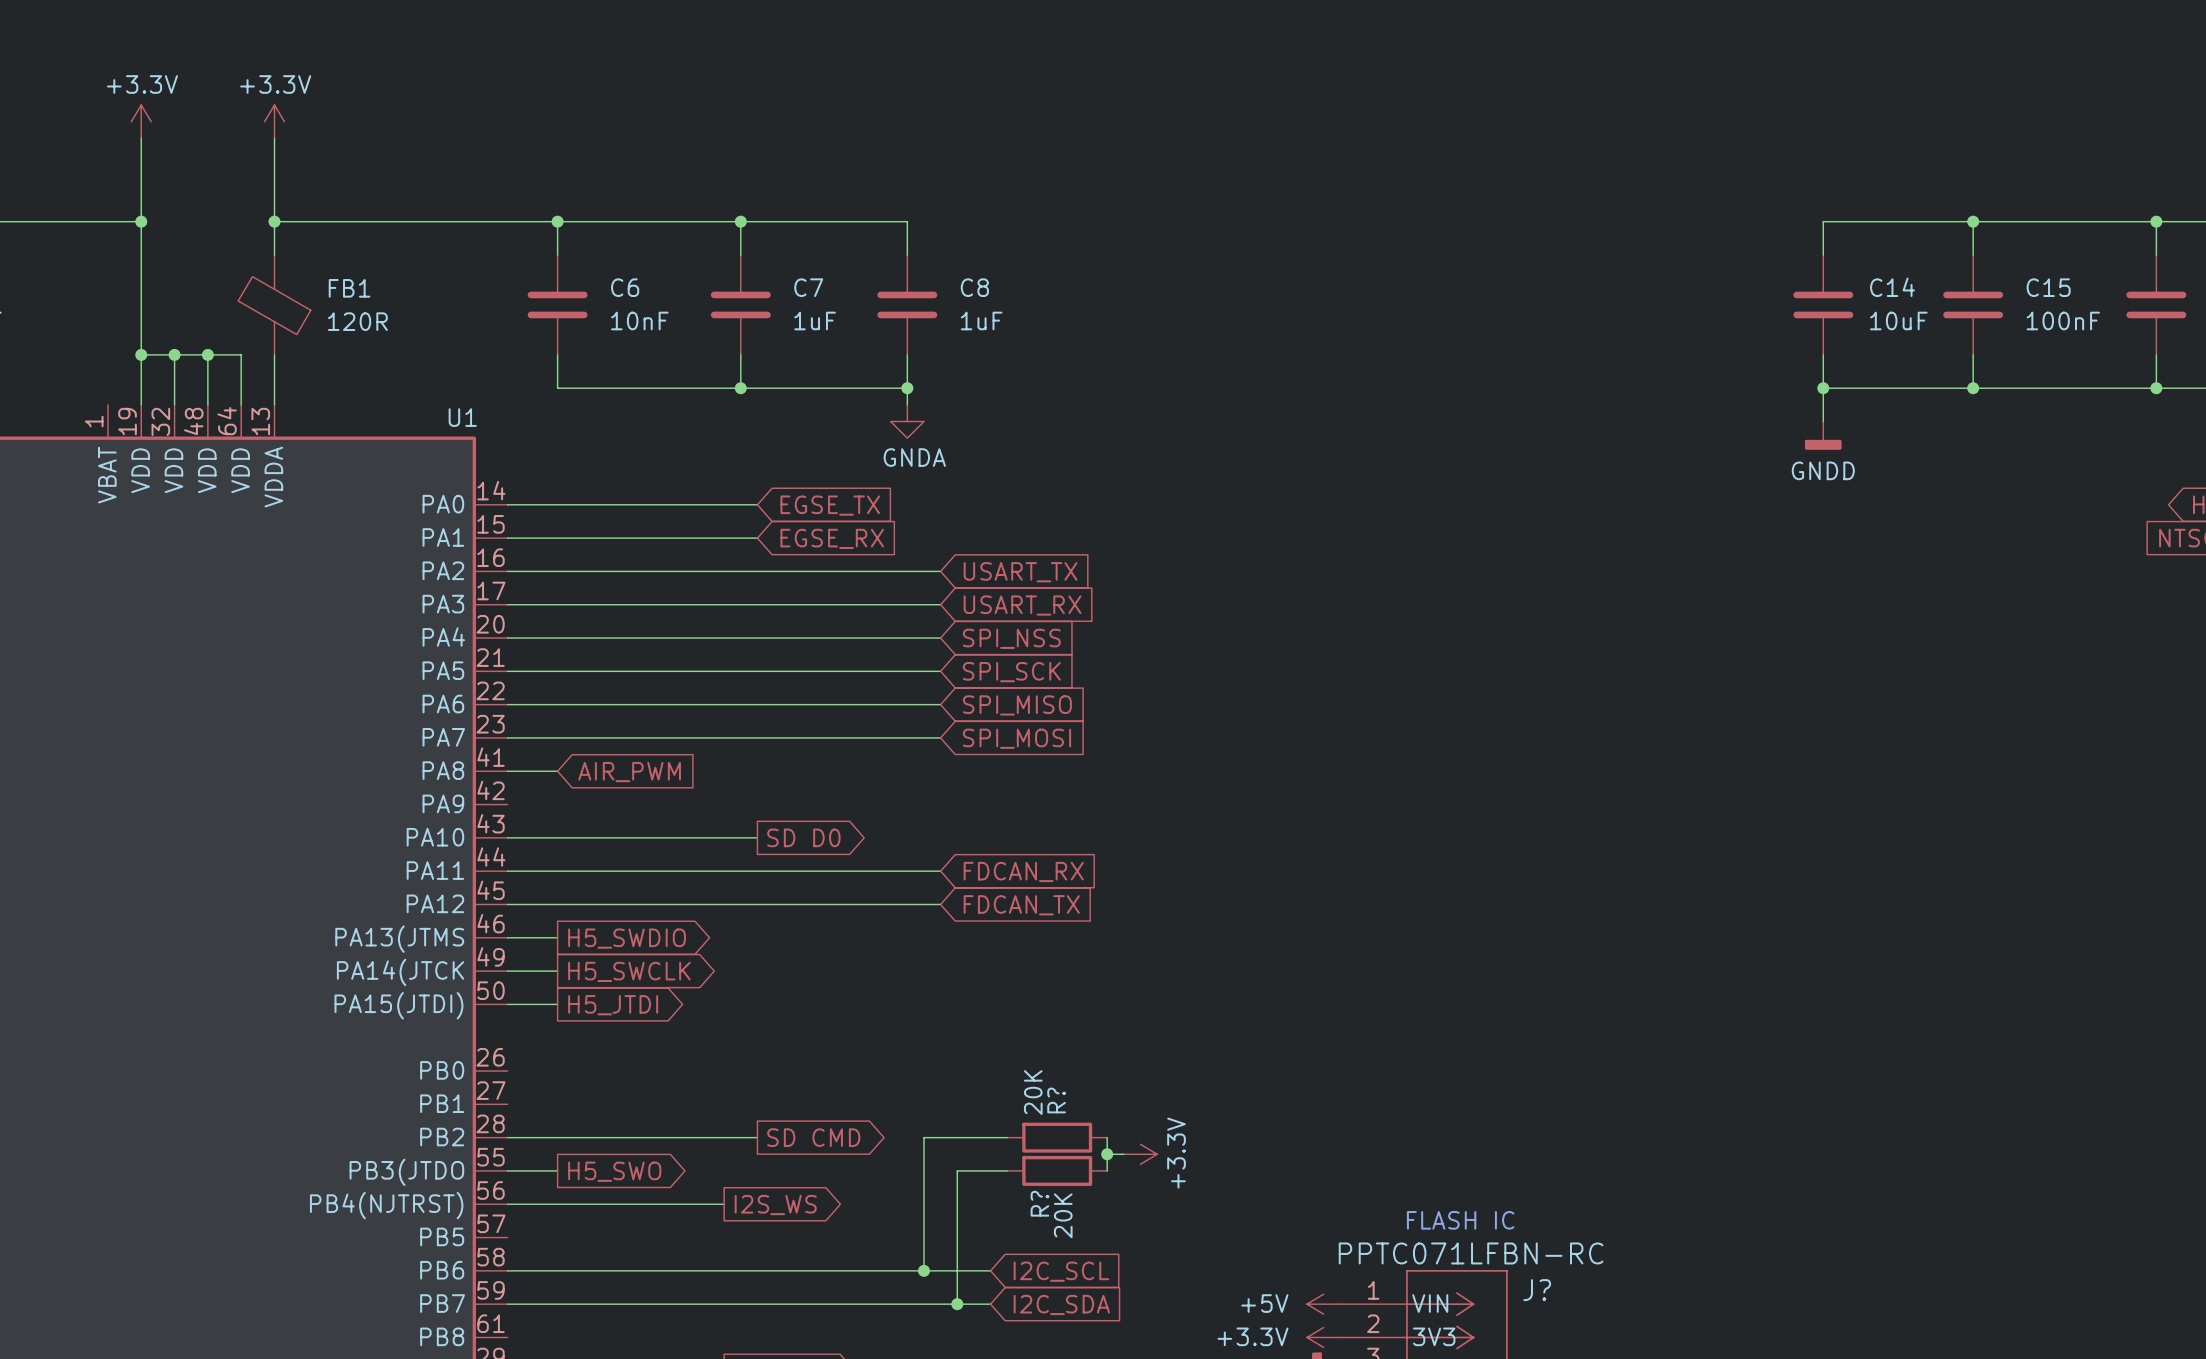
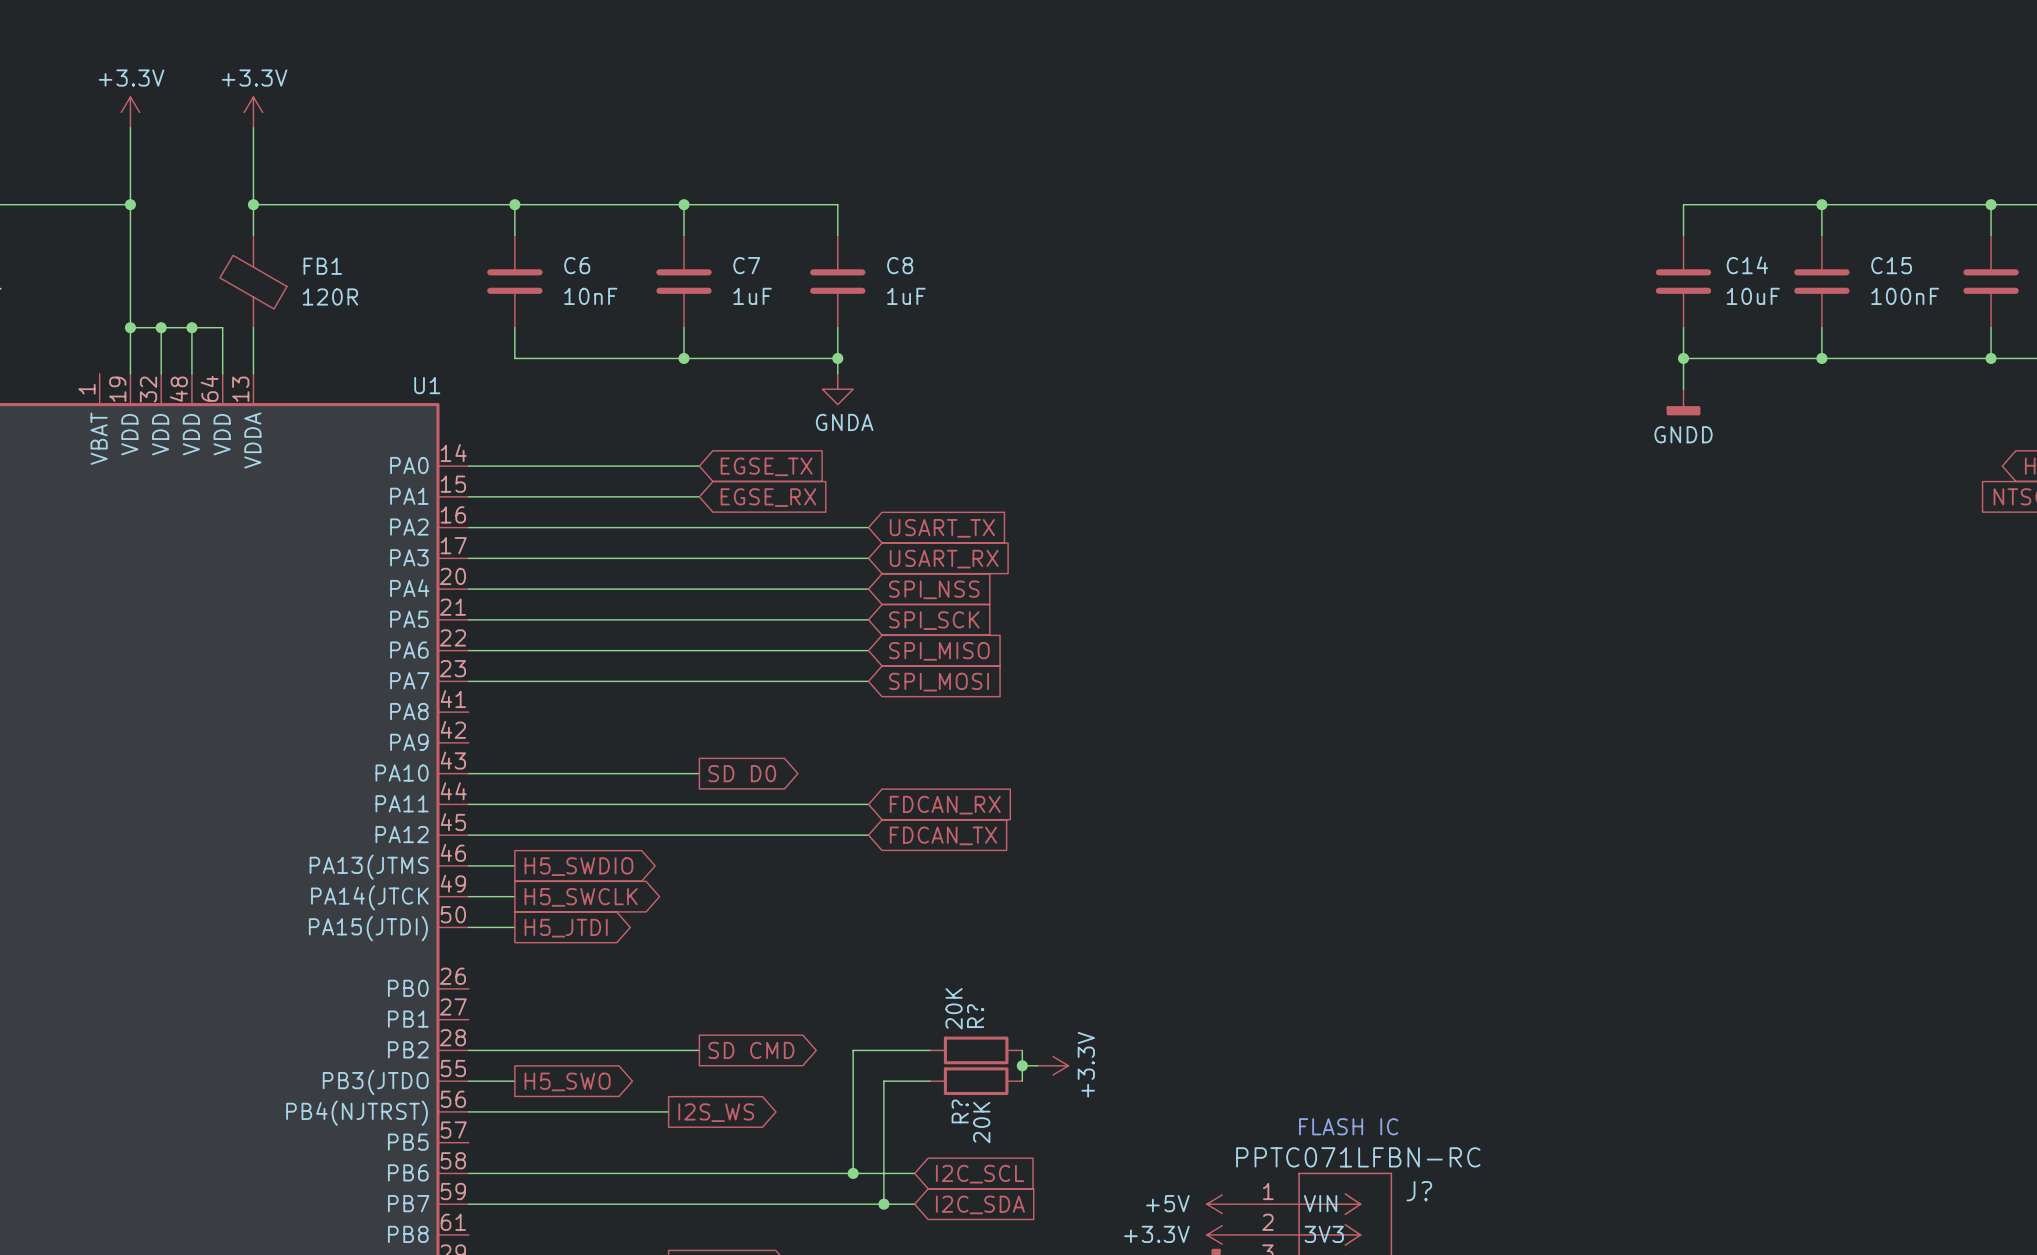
wire: (507, 771) (557, 771) -> none
global label: AIR_PWM (629, 772) -> none

